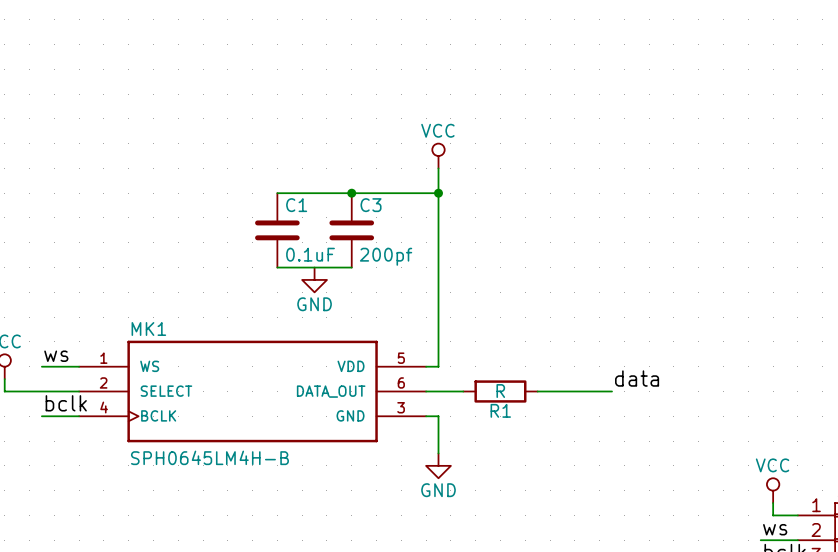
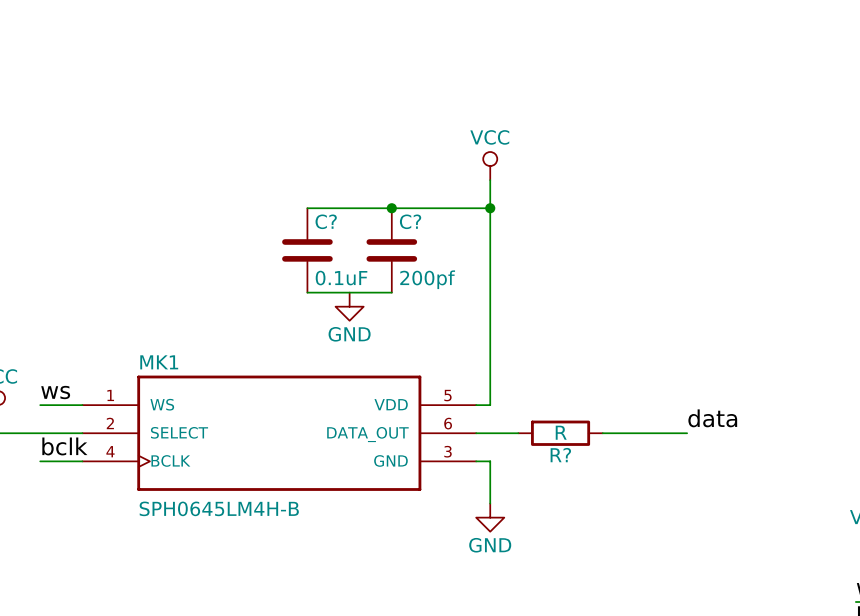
C1 name: C1 (296, 205) -> C? (326, 221)
C3 name: C3 (371, 205) -> C? (410, 221)
R1 name: R1 (500, 410) -> R? (560, 455)

